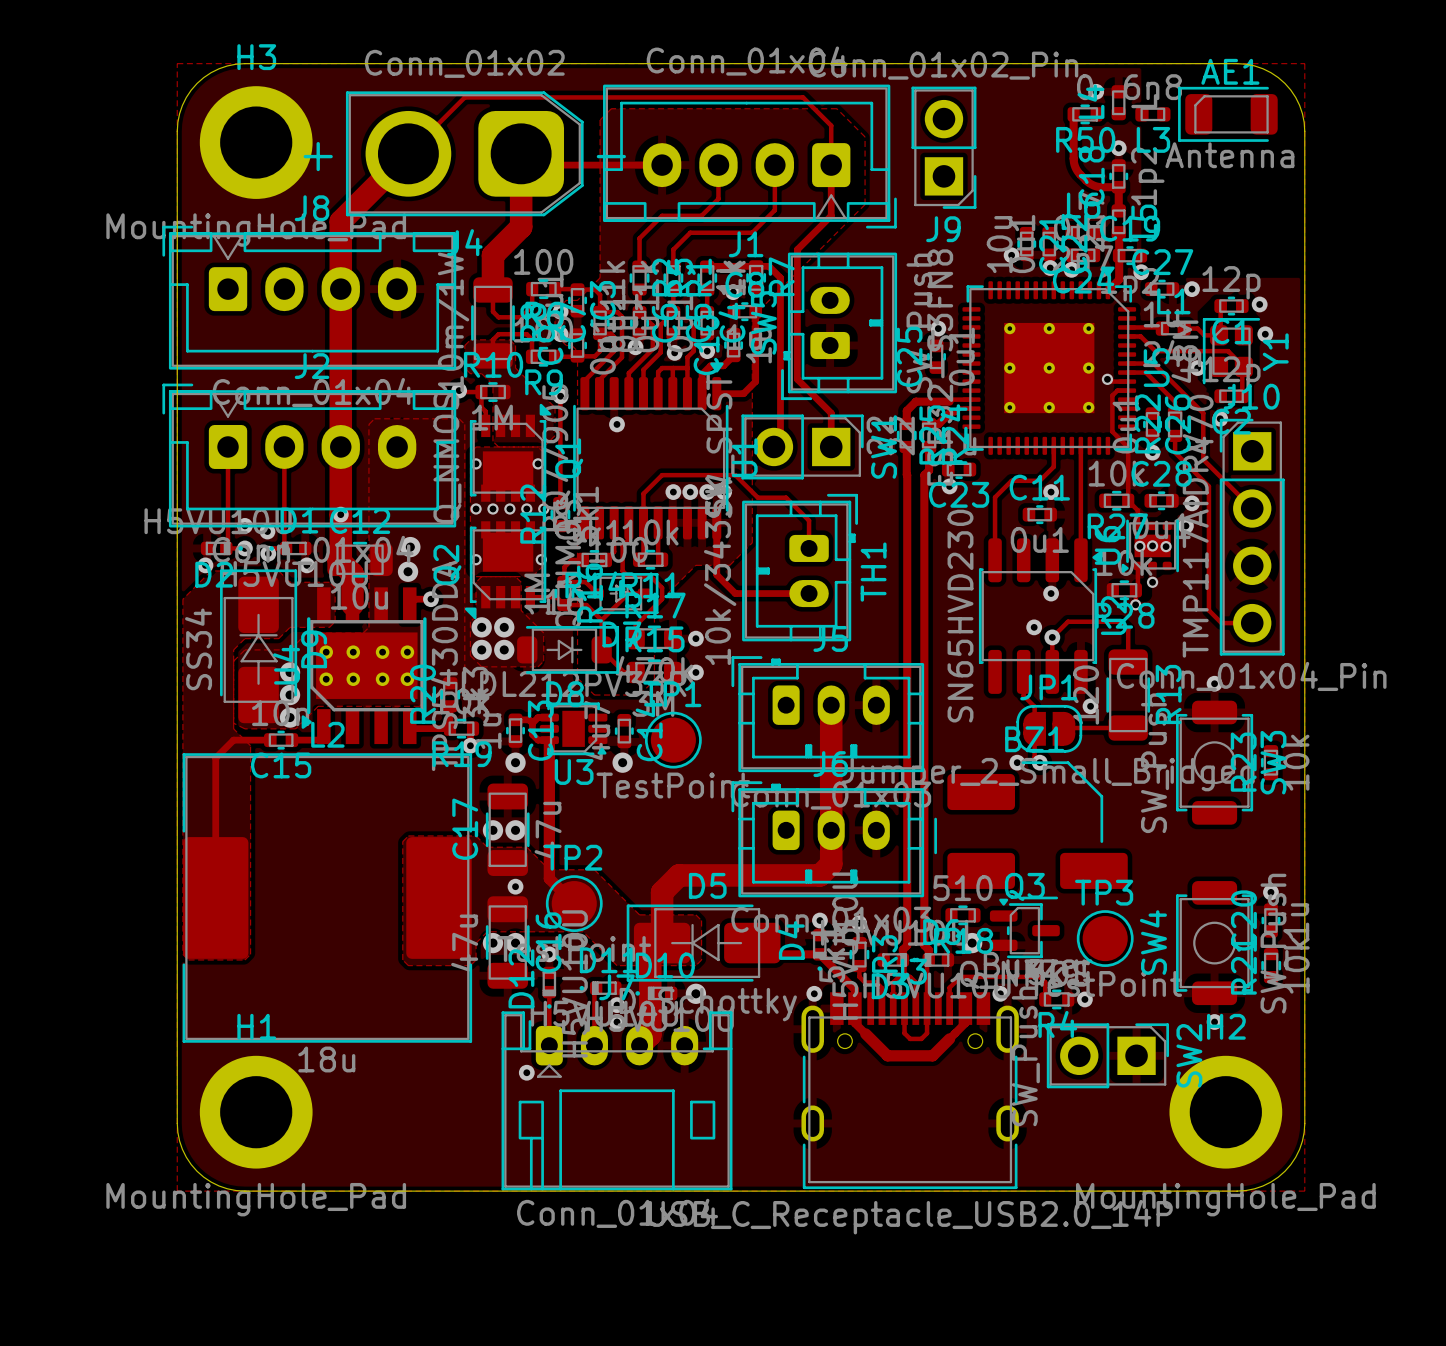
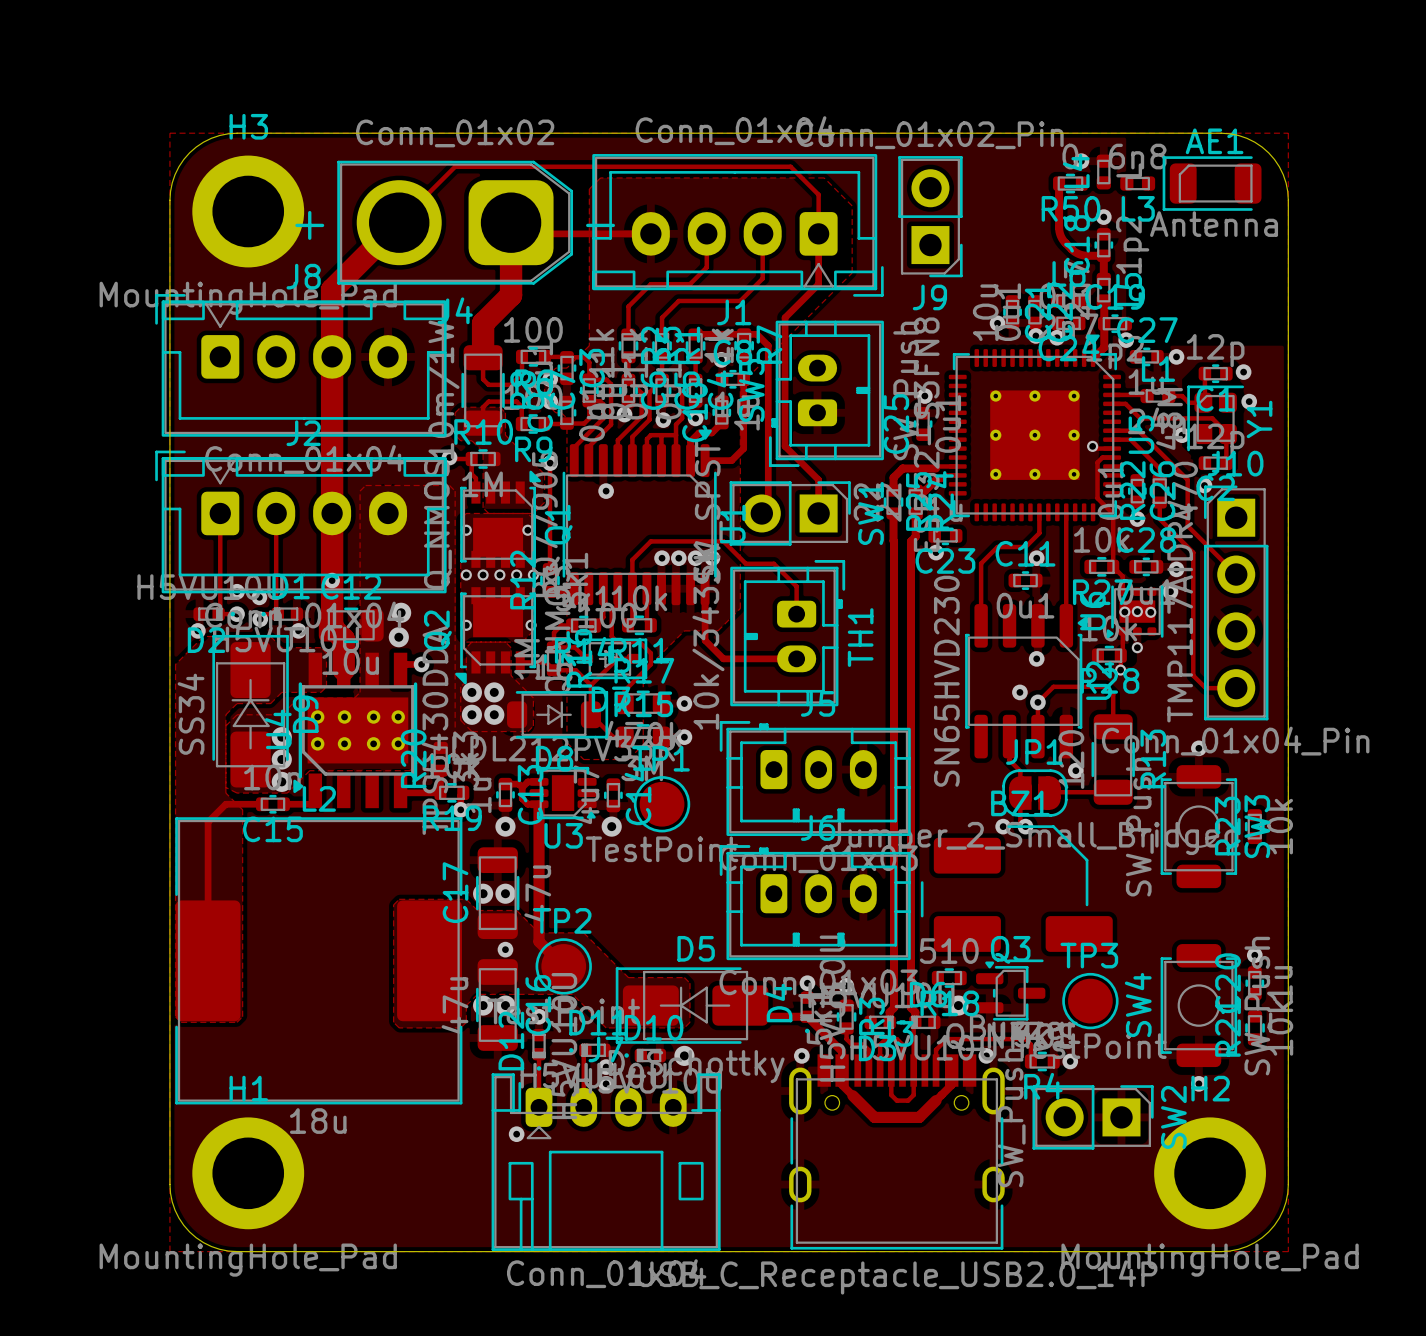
track: (831, 705) (831, 864) (819, 875) (679, 875) (662, 892) (662, 943) (650, 954) (650, 1034) (639, 1045) -> none

